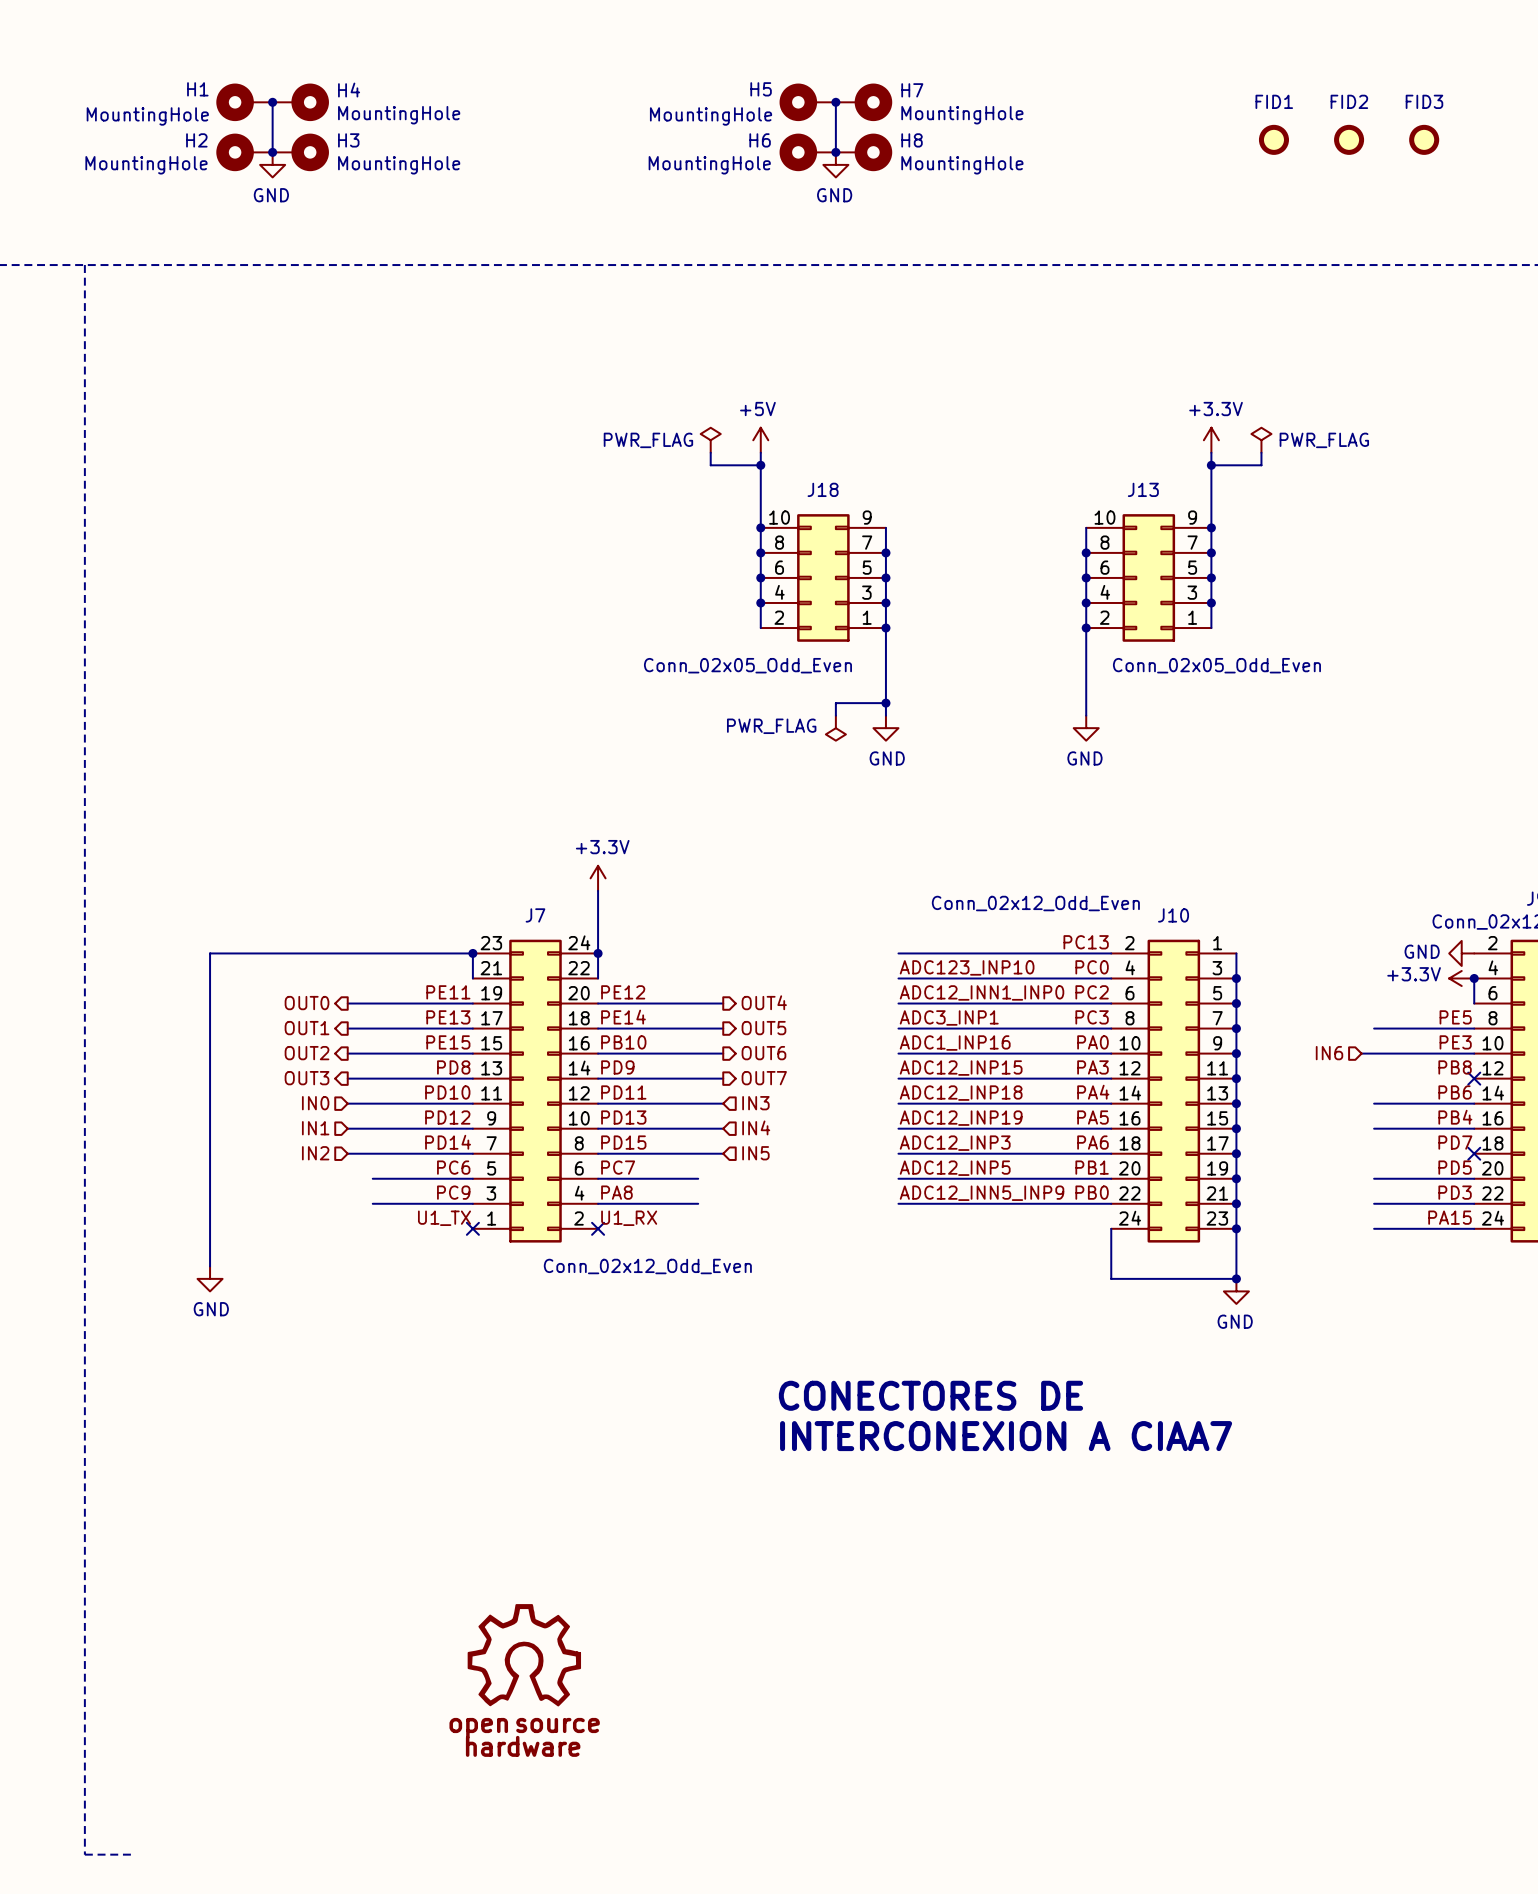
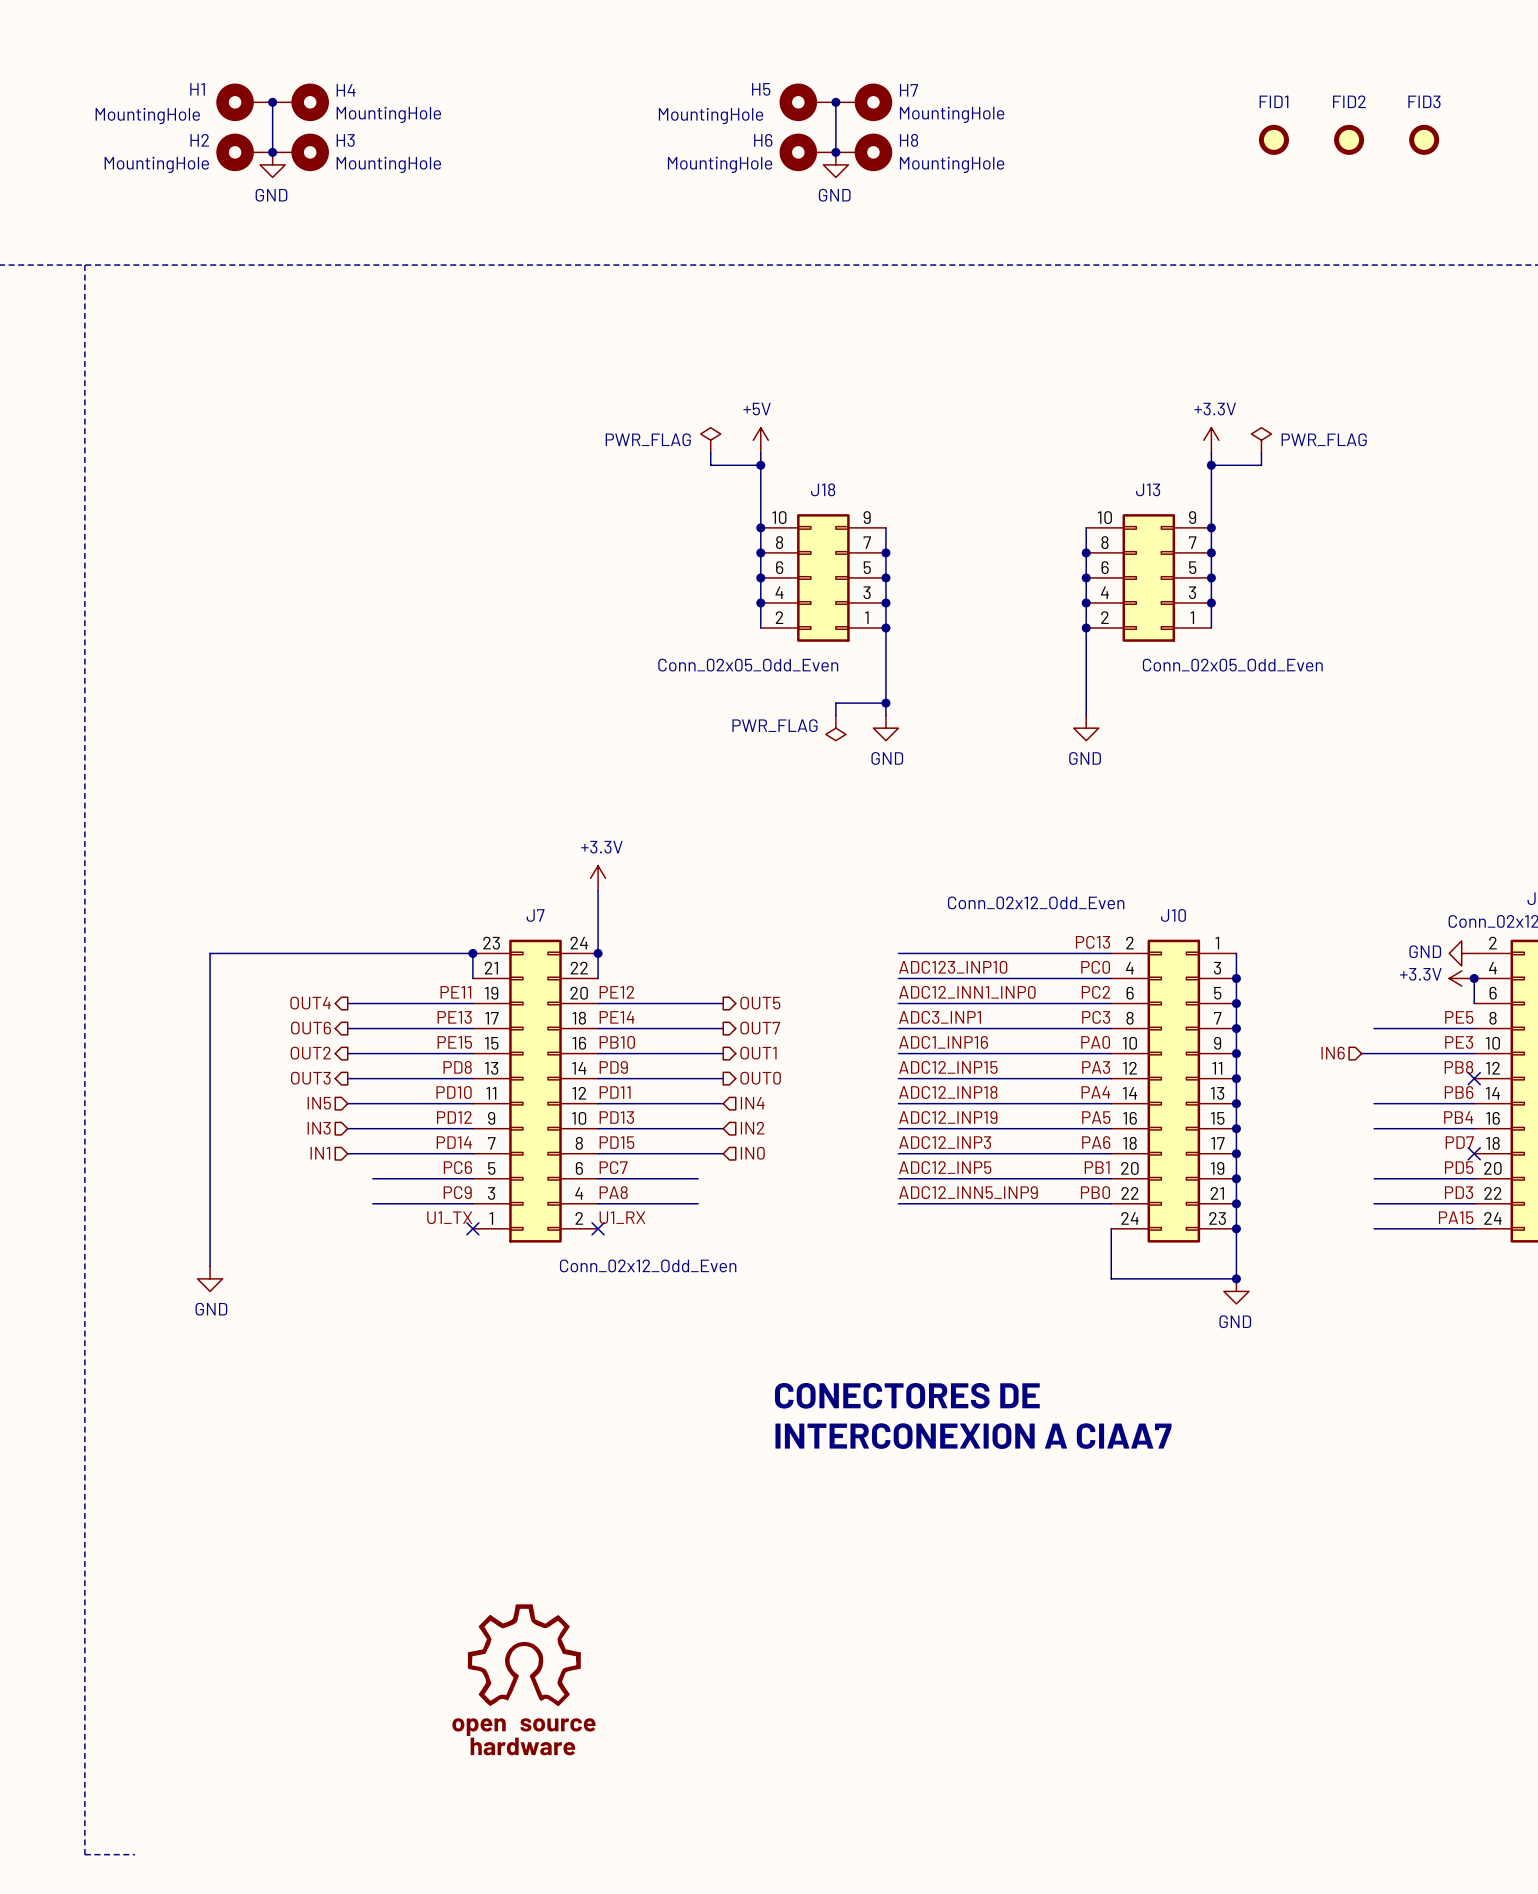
hierarchical label: OUT4 (764, 1002) -> OUT5 (760, 1003)
hierarchical label: OUT0 (307, 1003) -> OUT4 (310, 1003)
hierarchical label: OUT1 (307, 1028) -> OUT6 (310, 1028)
hierarchical label: OUT5 (763, 1028) -> OUT7 (760, 1028)
hierarchical label: OUT6 (763, 1053) -> OUT1 (758, 1053)
hierarchical label: OUT7 (764, 1078) -> OUT0 (760, 1078)
hierarchical label: IN0 (315, 1103) -> IN5 (319, 1103)
hierarchical label: IN3 (755, 1103) -> IN4 (752, 1103)
hierarchical label: IN4 (756, 1127) -> IN2 (752, 1128)
hierarchical label: IN1 (315, 1128) -> IN3 (319, 1128)
hierarchical label: IN2 (315, 1153) -> IN1 (320, 1153)
hierarchical label: IN5 (755, 1153) -> IN0 (752, 1153)

